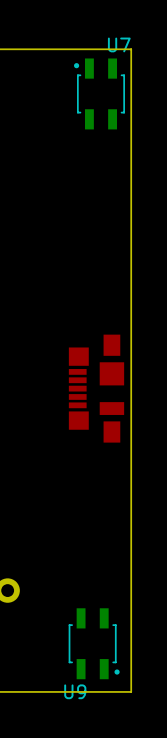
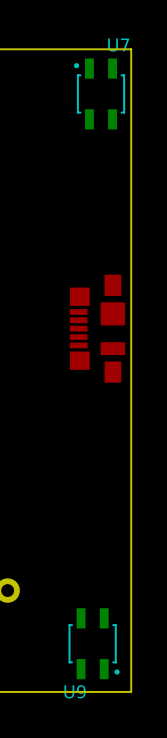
part position: (96, 388) -> (97, 328)

